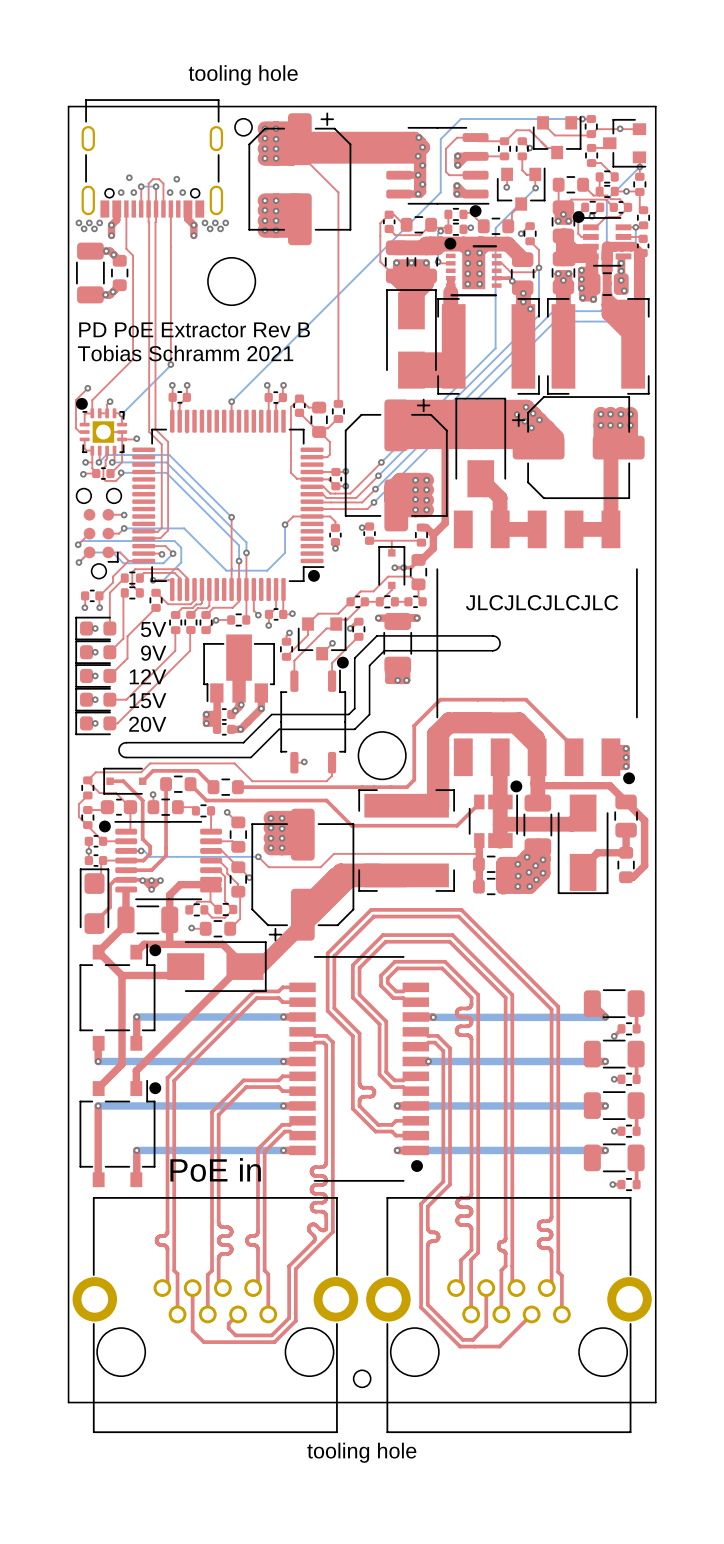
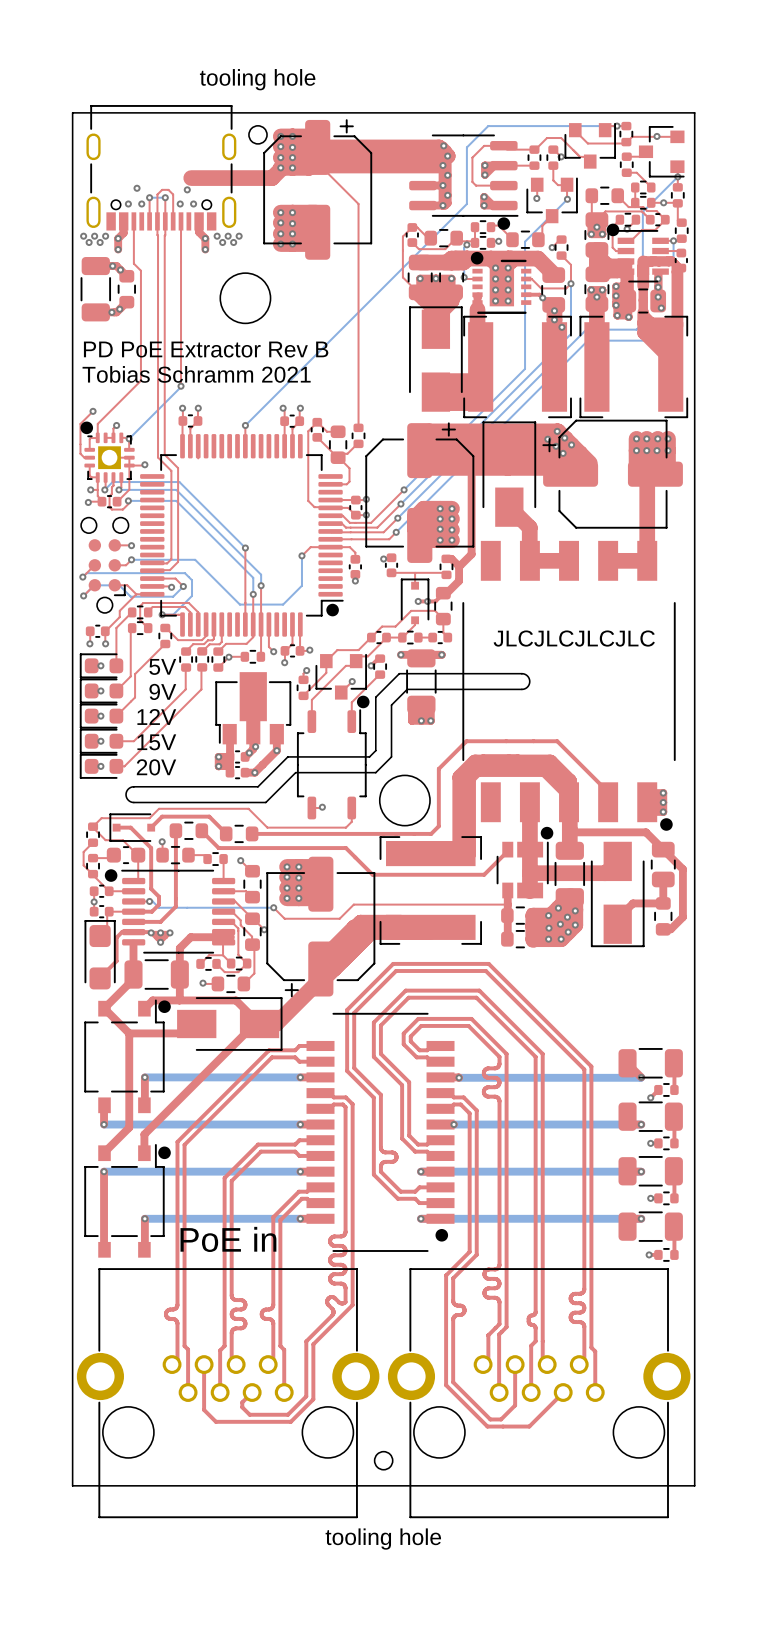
top track: none -> (292, 157) (272, 178) (191, 178)

